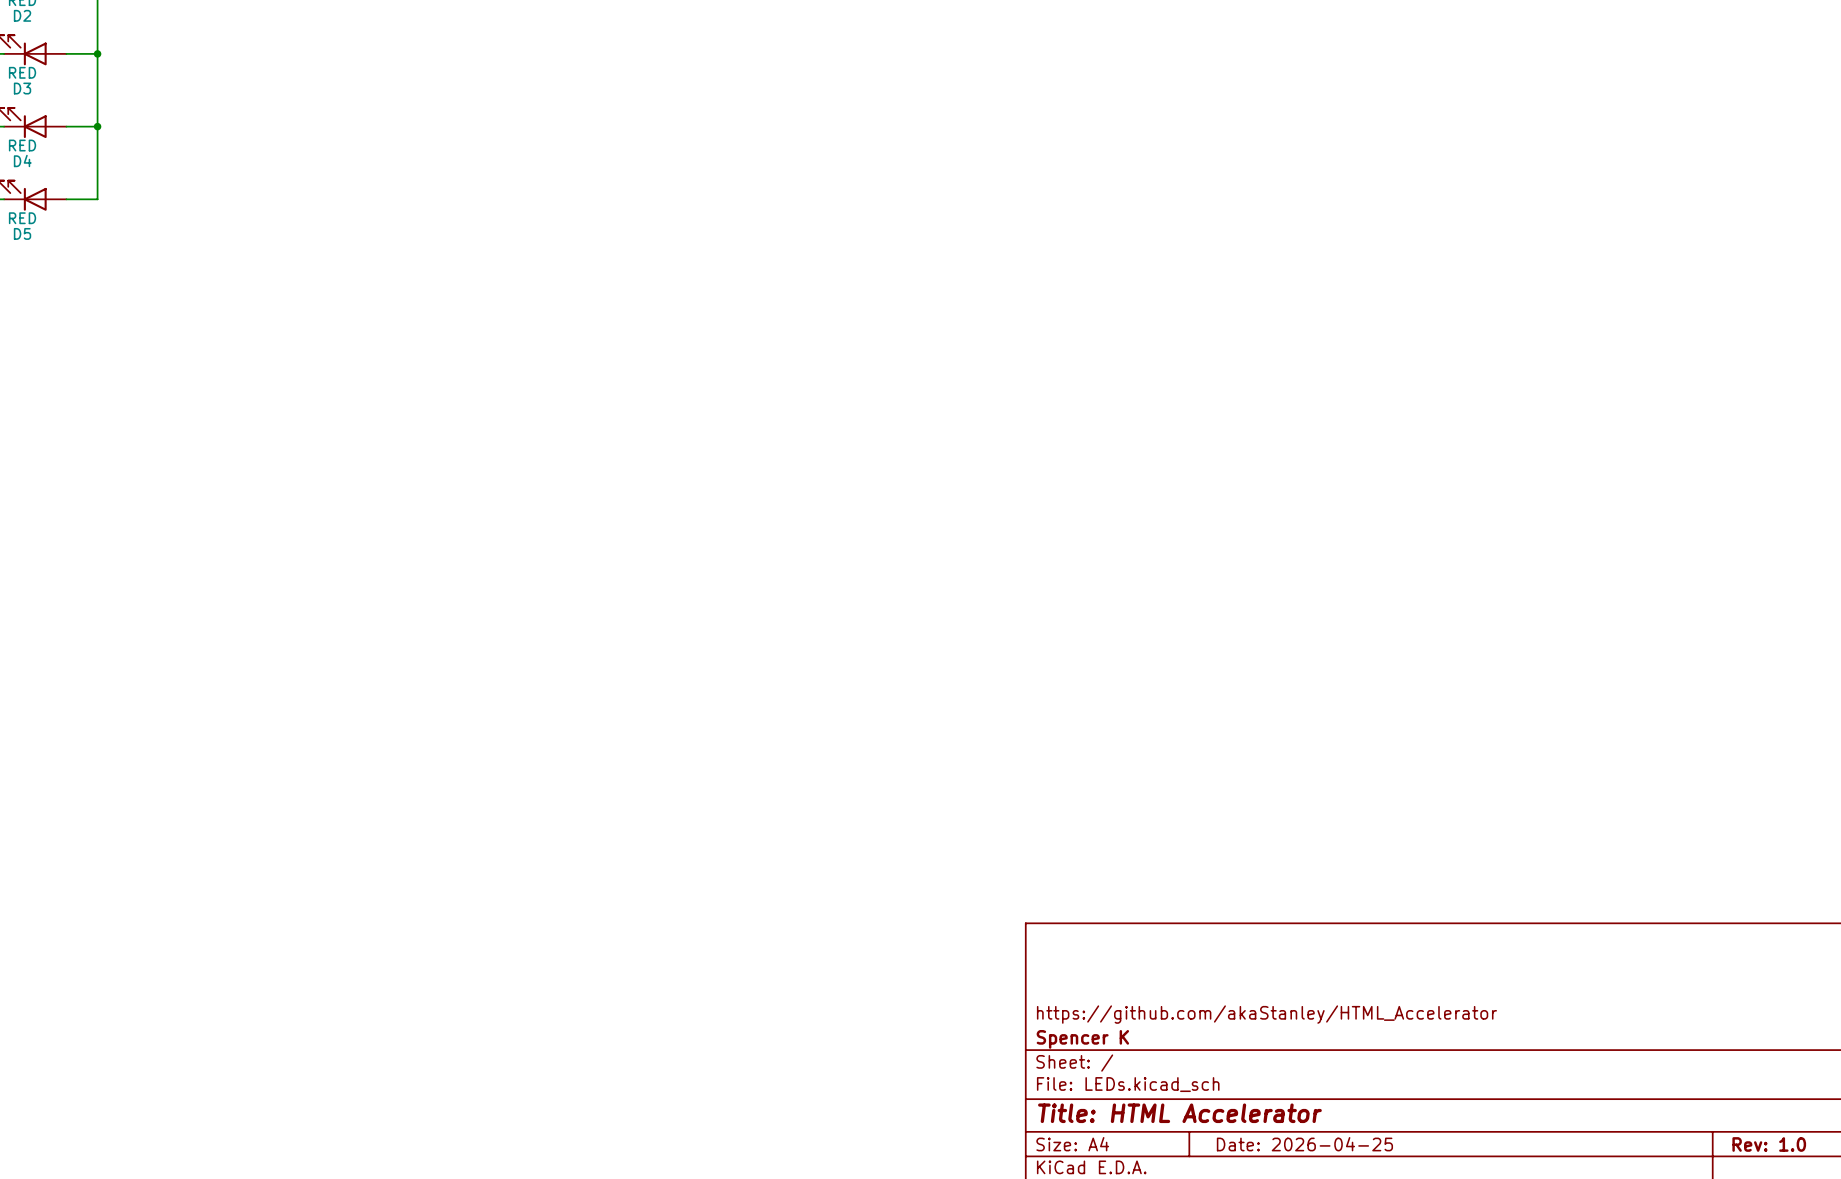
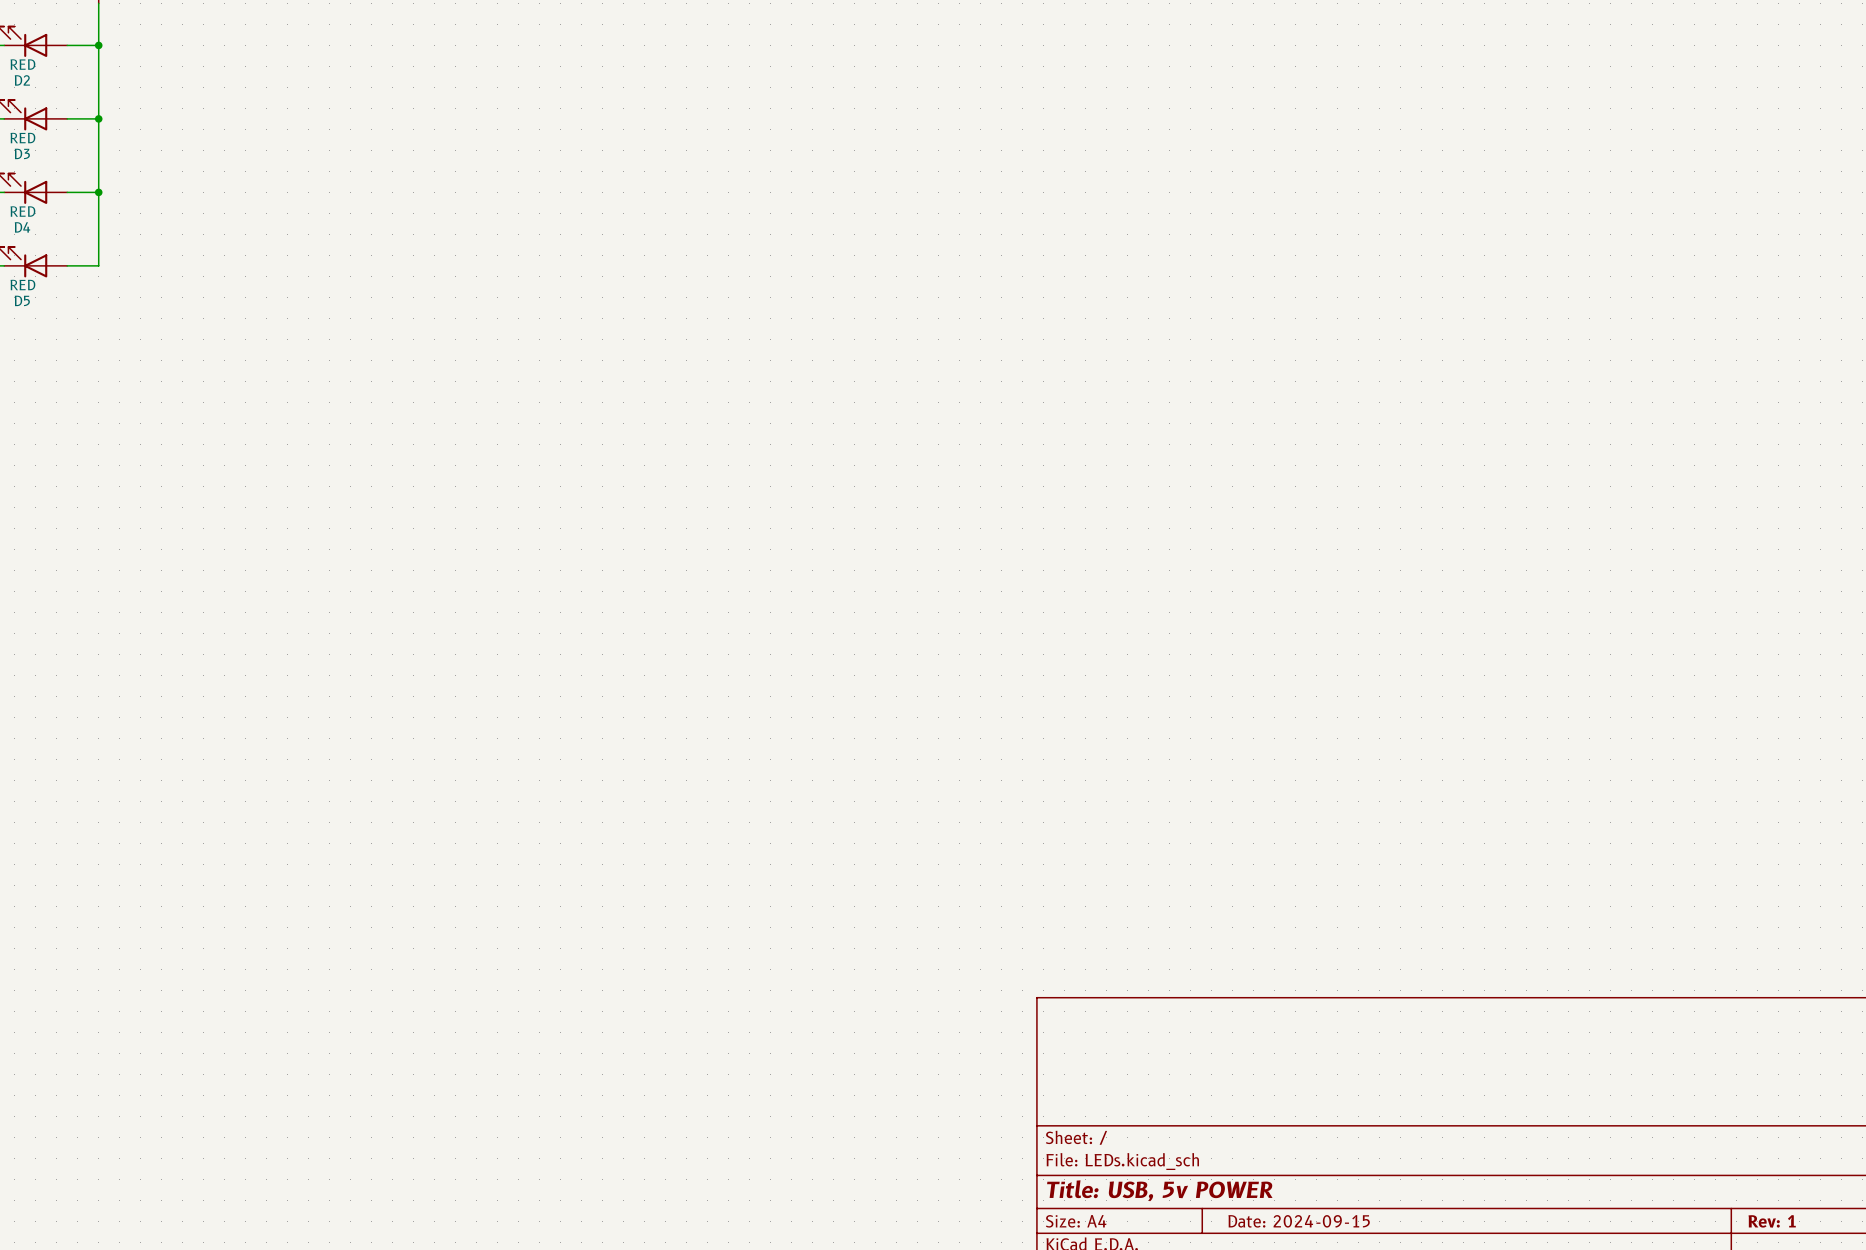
title block: https://github.com/akaStanley/HTML_Accelerator (1266, 1014) -> none
title block: Spencer K (1082, 1039) -> none
title block: Title: HTML Accelerator (1179, 1113) -> Title: USB, 5v POWER (1159, 1190)
title block: Date: 2026-04-25 (1304, 1144) -> Date: 2024-09-15 (1299, 1221)
title block: Rev: 1.0 (1769, 1144) -> Rev: 1 (1772, 1221)

